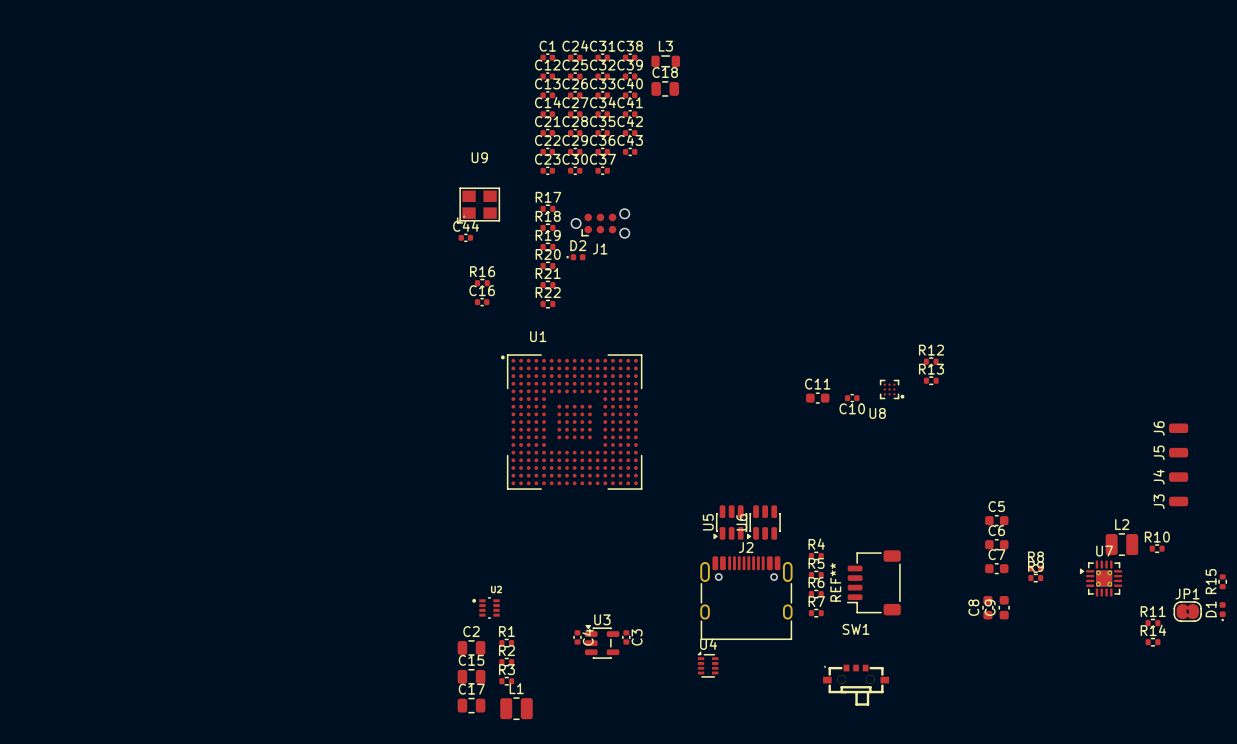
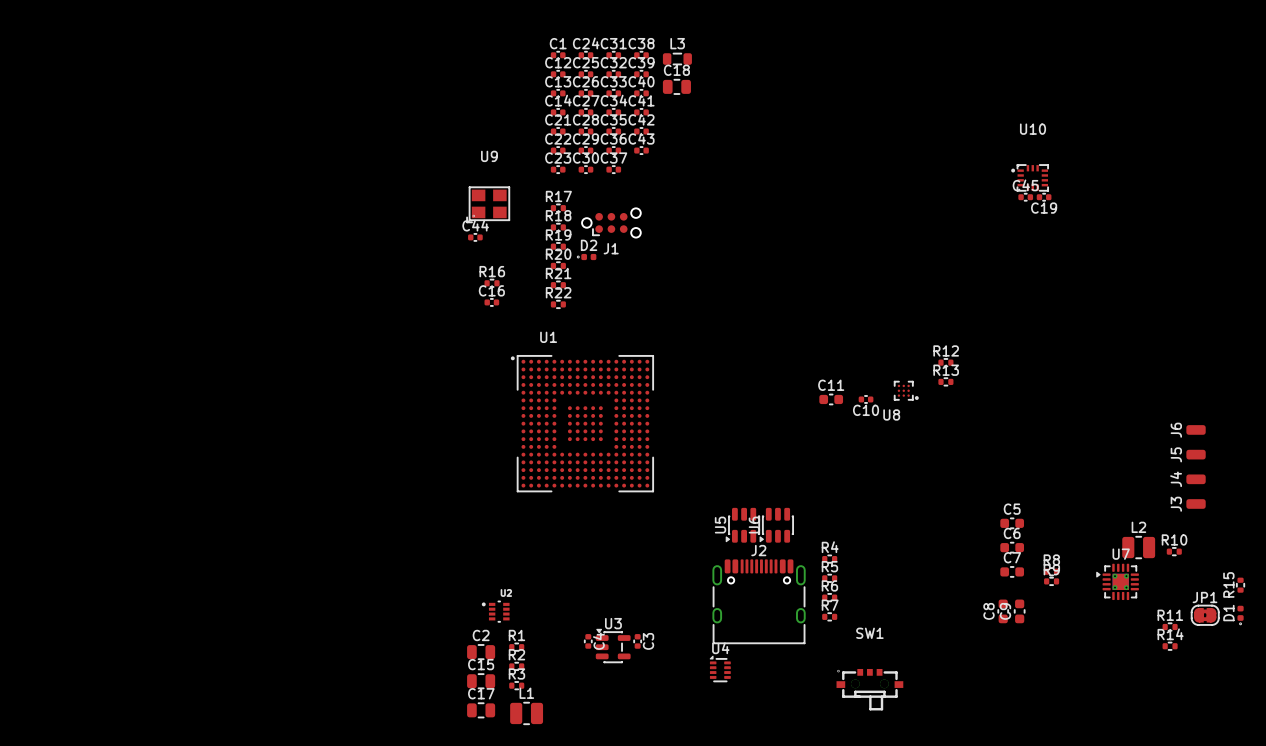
U10: none -> (1029, 177)
C45: none -> (1025, 197)
C19: none -> (1044, 197)
REF**: (873, 582) -> none

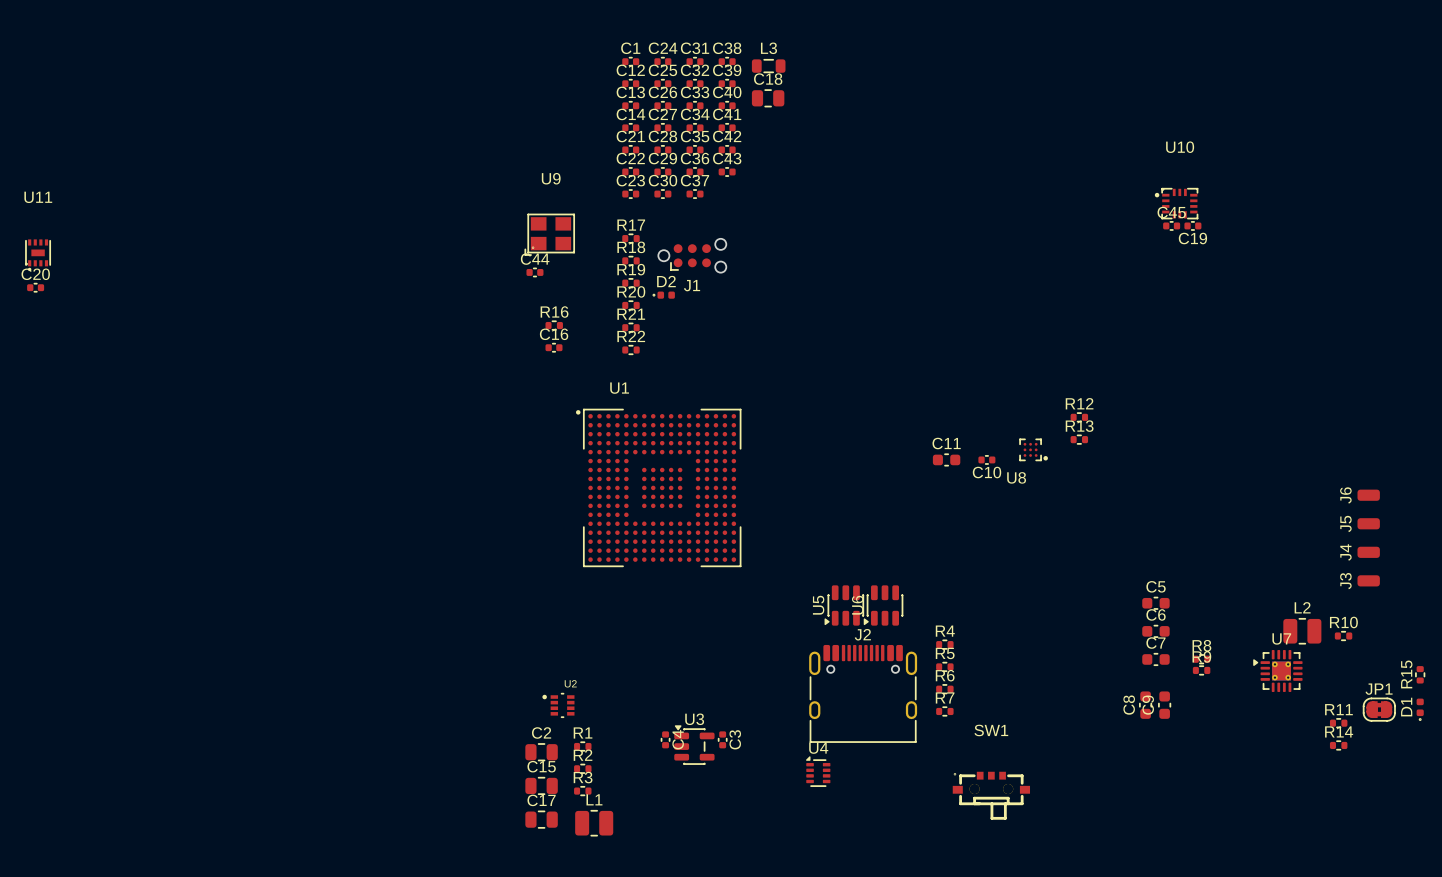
U11: none -> (38, 255)
C20: none -> (35, 287)

